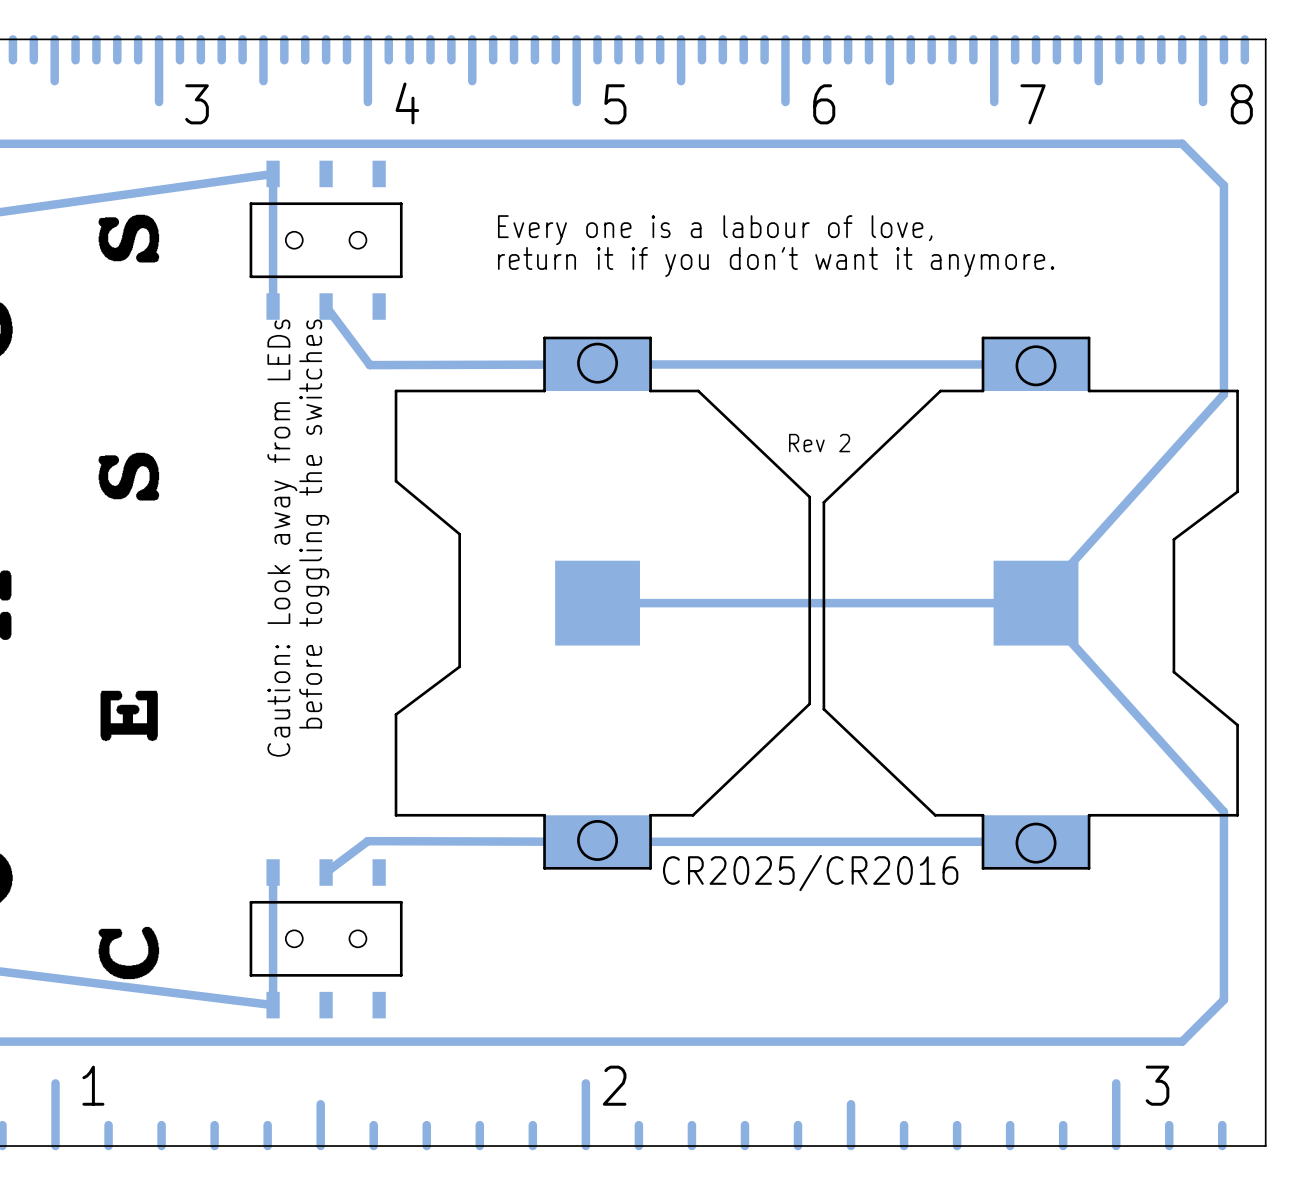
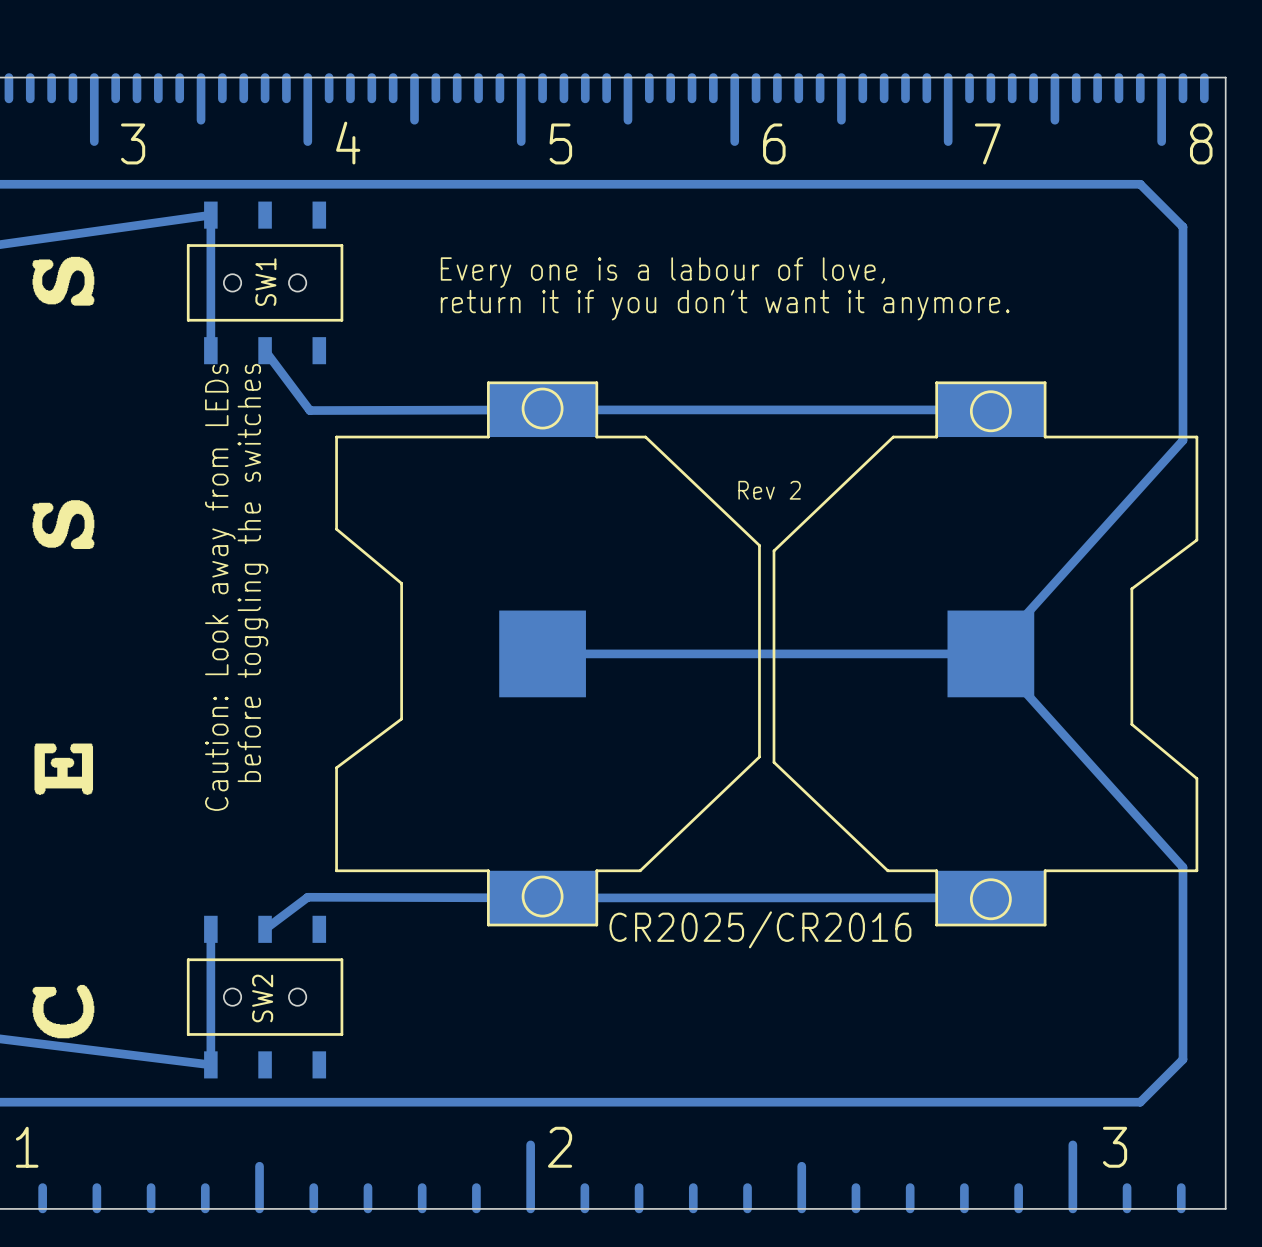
SW1 name: none -> SW1 (265, 282)
SW2 name: none -> SW2 (262, 998)

